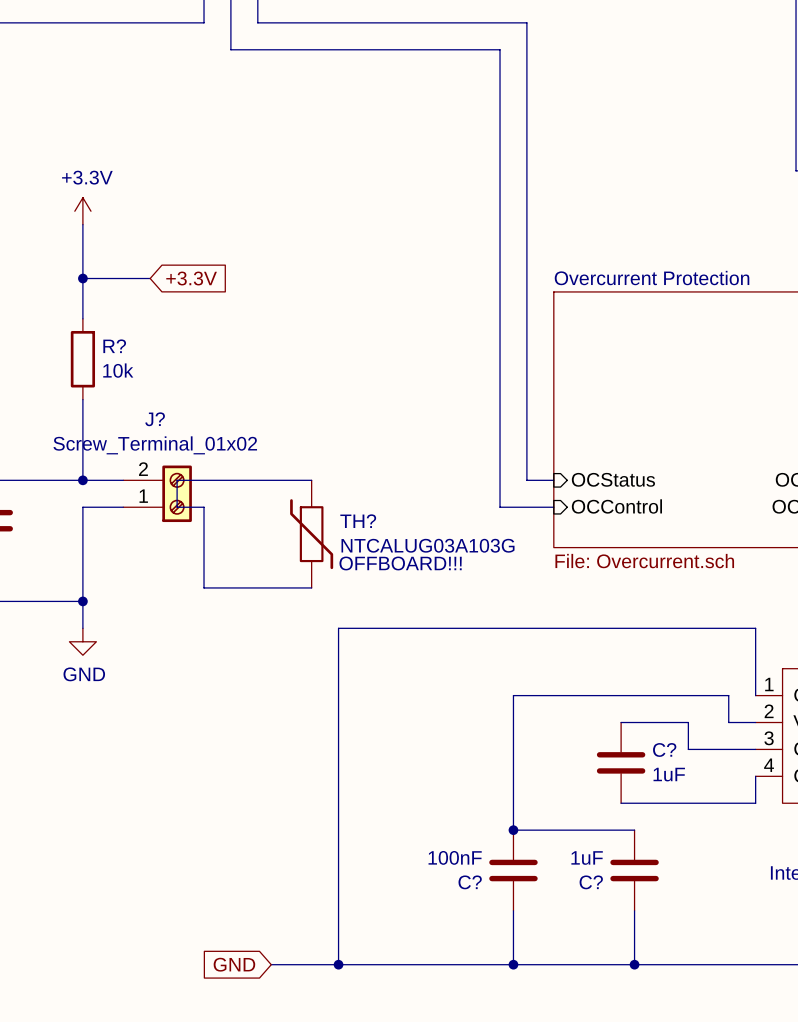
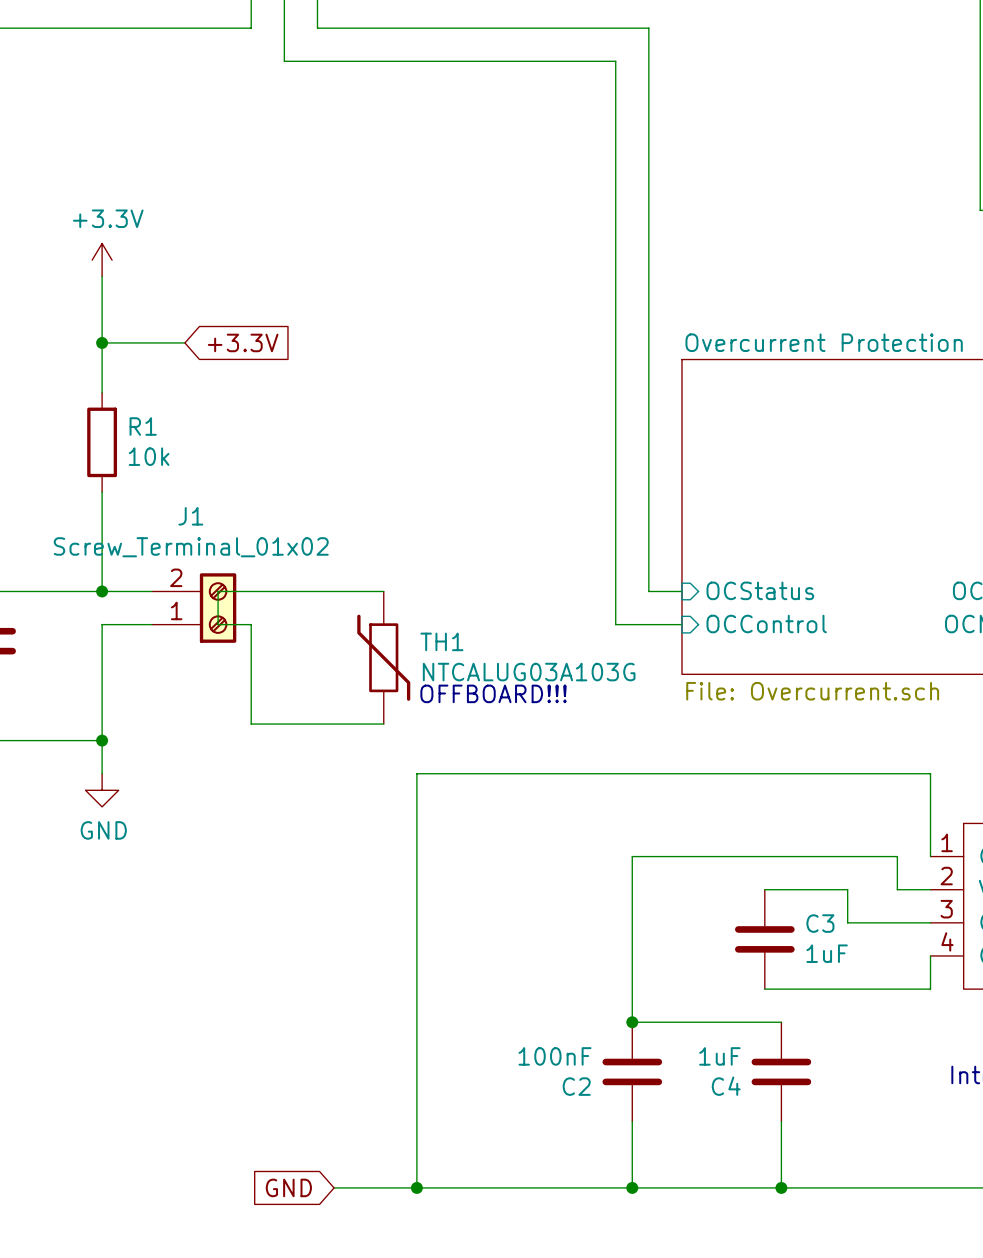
R? name: R? (114, 346) -> R1 (143, 426)
J? name: J? (155, 419) -> J1 (190, 516)
TH? name: TH? (358, 521) -> TH1 (441, 641)
C? name: C? (664, 749) -> C3 (820, 923)
C? name: C? (470, 882) -> C2 (576, 1086)
C? name: C? (591, 882) -> C4 (726, 1086)

